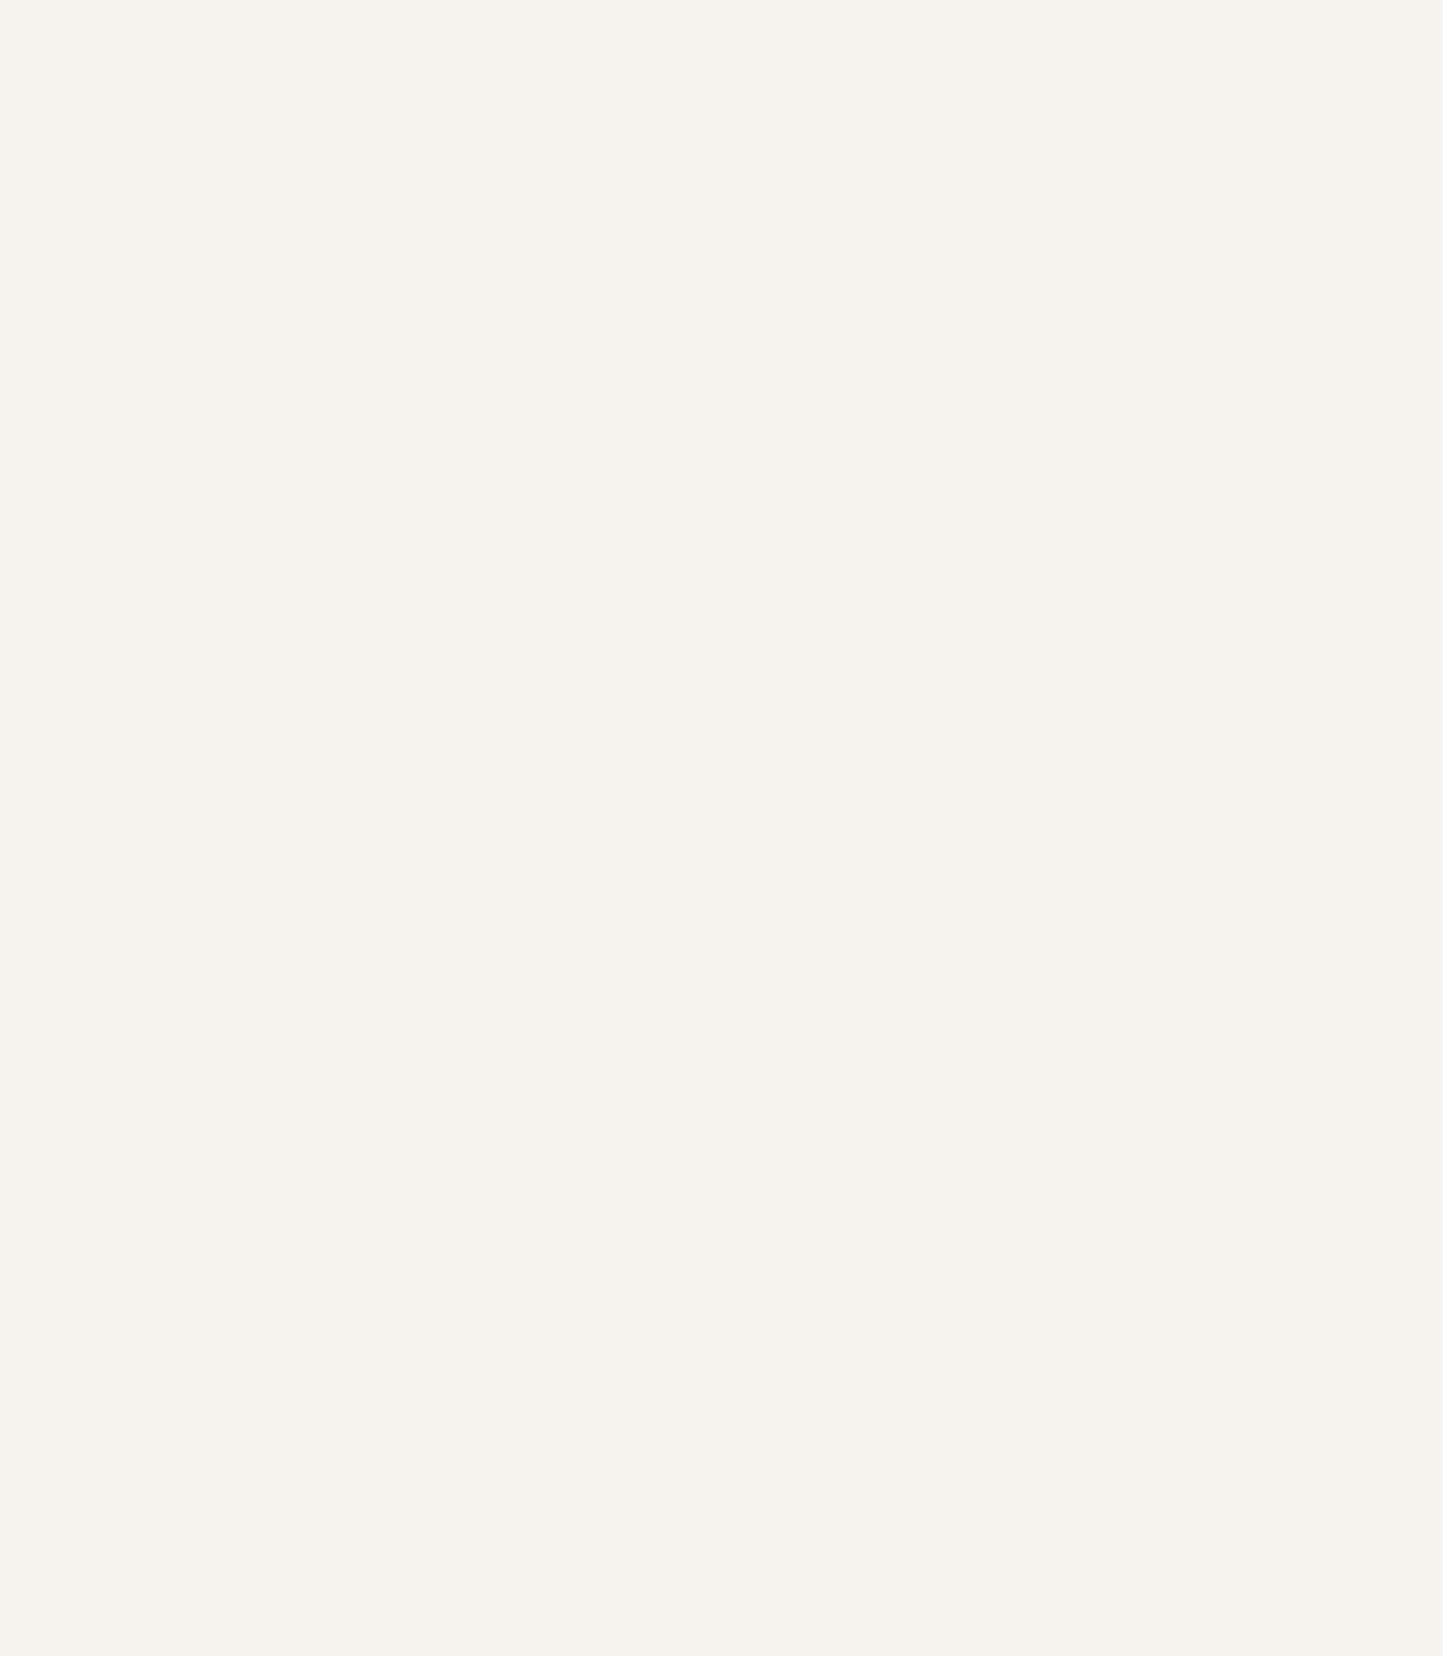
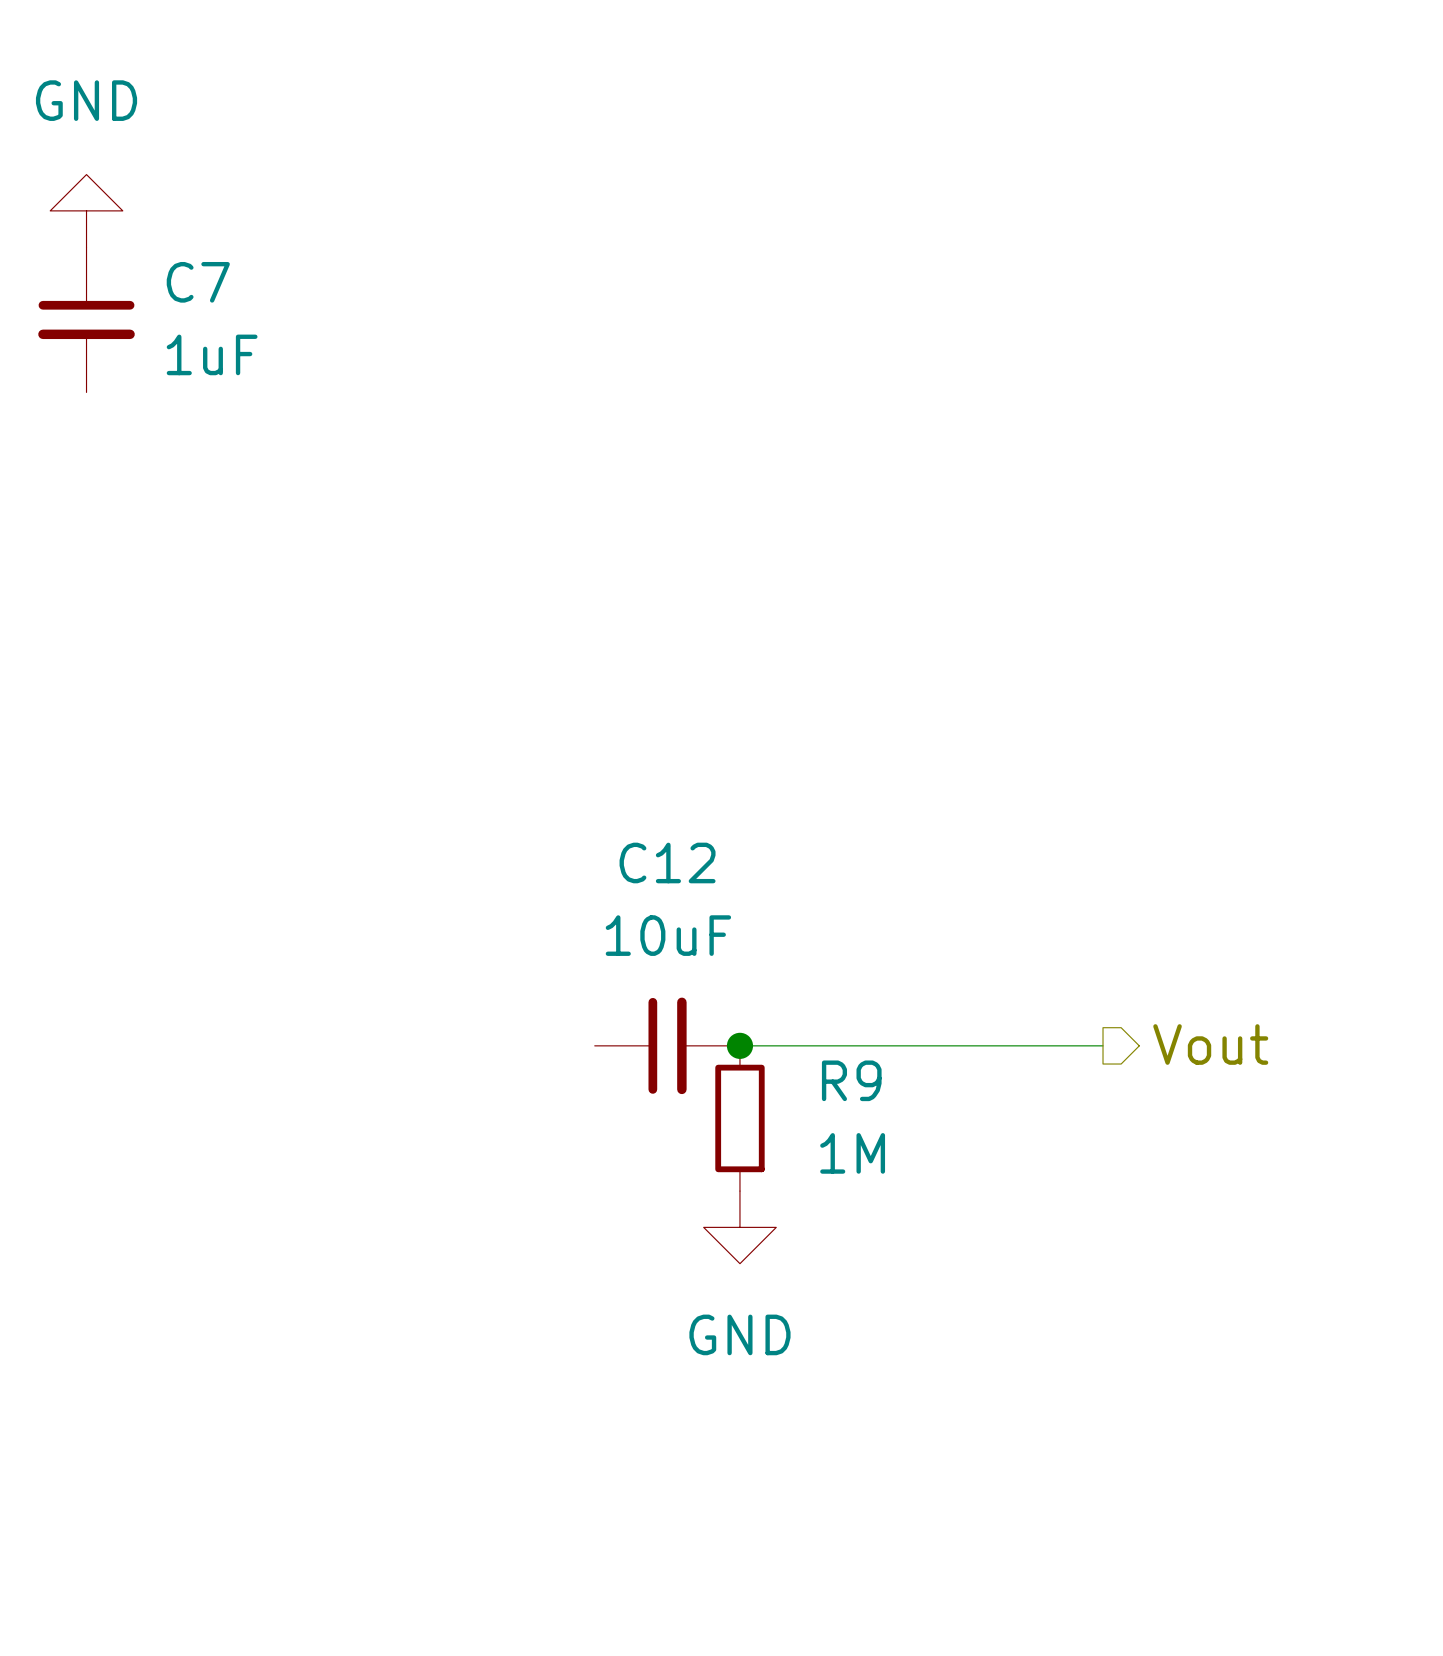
power symbol: none -> GND (86, 210)
C7: none -> 1uF (86, 319)
hierarchical label: none -> Vout (1210, 1044)
C12: none -> 10uF (667, 1045)
wire: none -> (739, 1045) (1103, 1045)
junction: none -> (739, 1045)
R9: none -> 1M (739, 1118)
power symbol: none -> GND (739, 1227)

